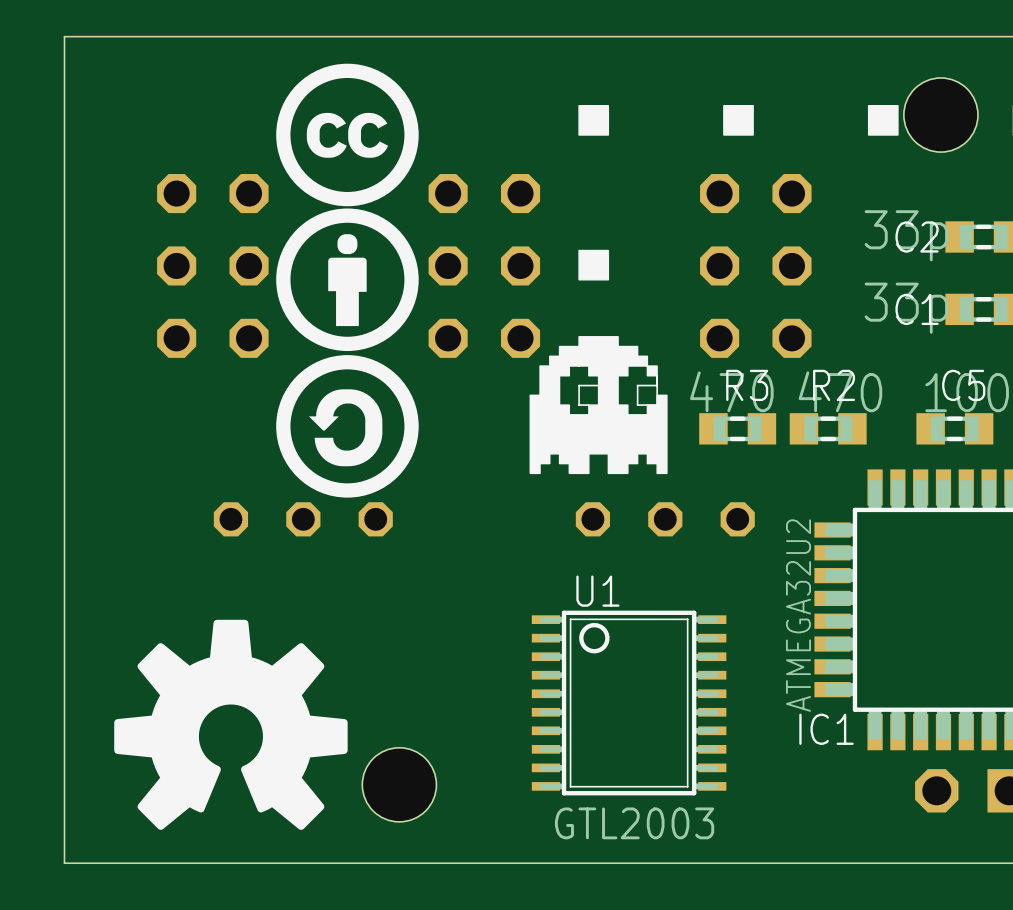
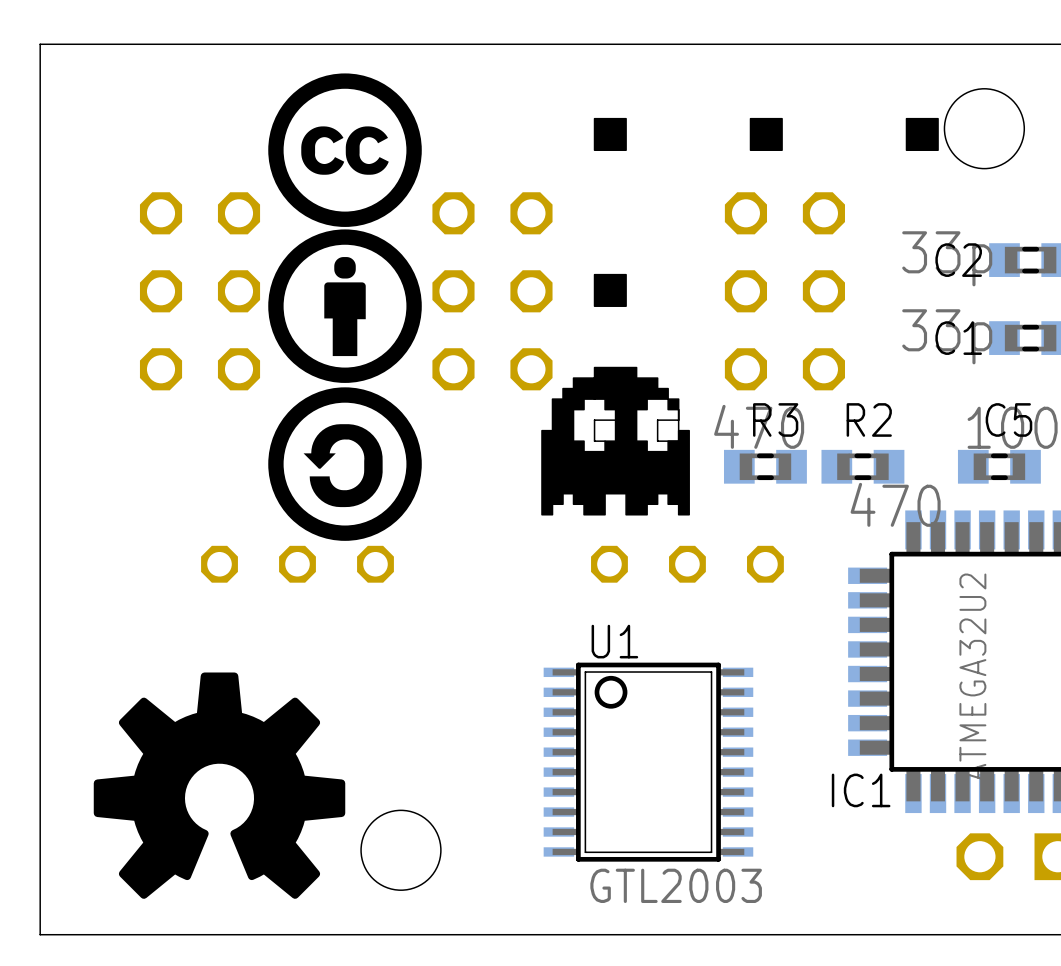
R2 value position: 470 (840, 391) -> 470 (895, 504)
IC1 value position: ATMEGA32U2 (798, 615) -> ATMEGA32U2 (972, 677)
U1 value position: GTL2003 (634, 823) -> GTL2003 (676, 885)

